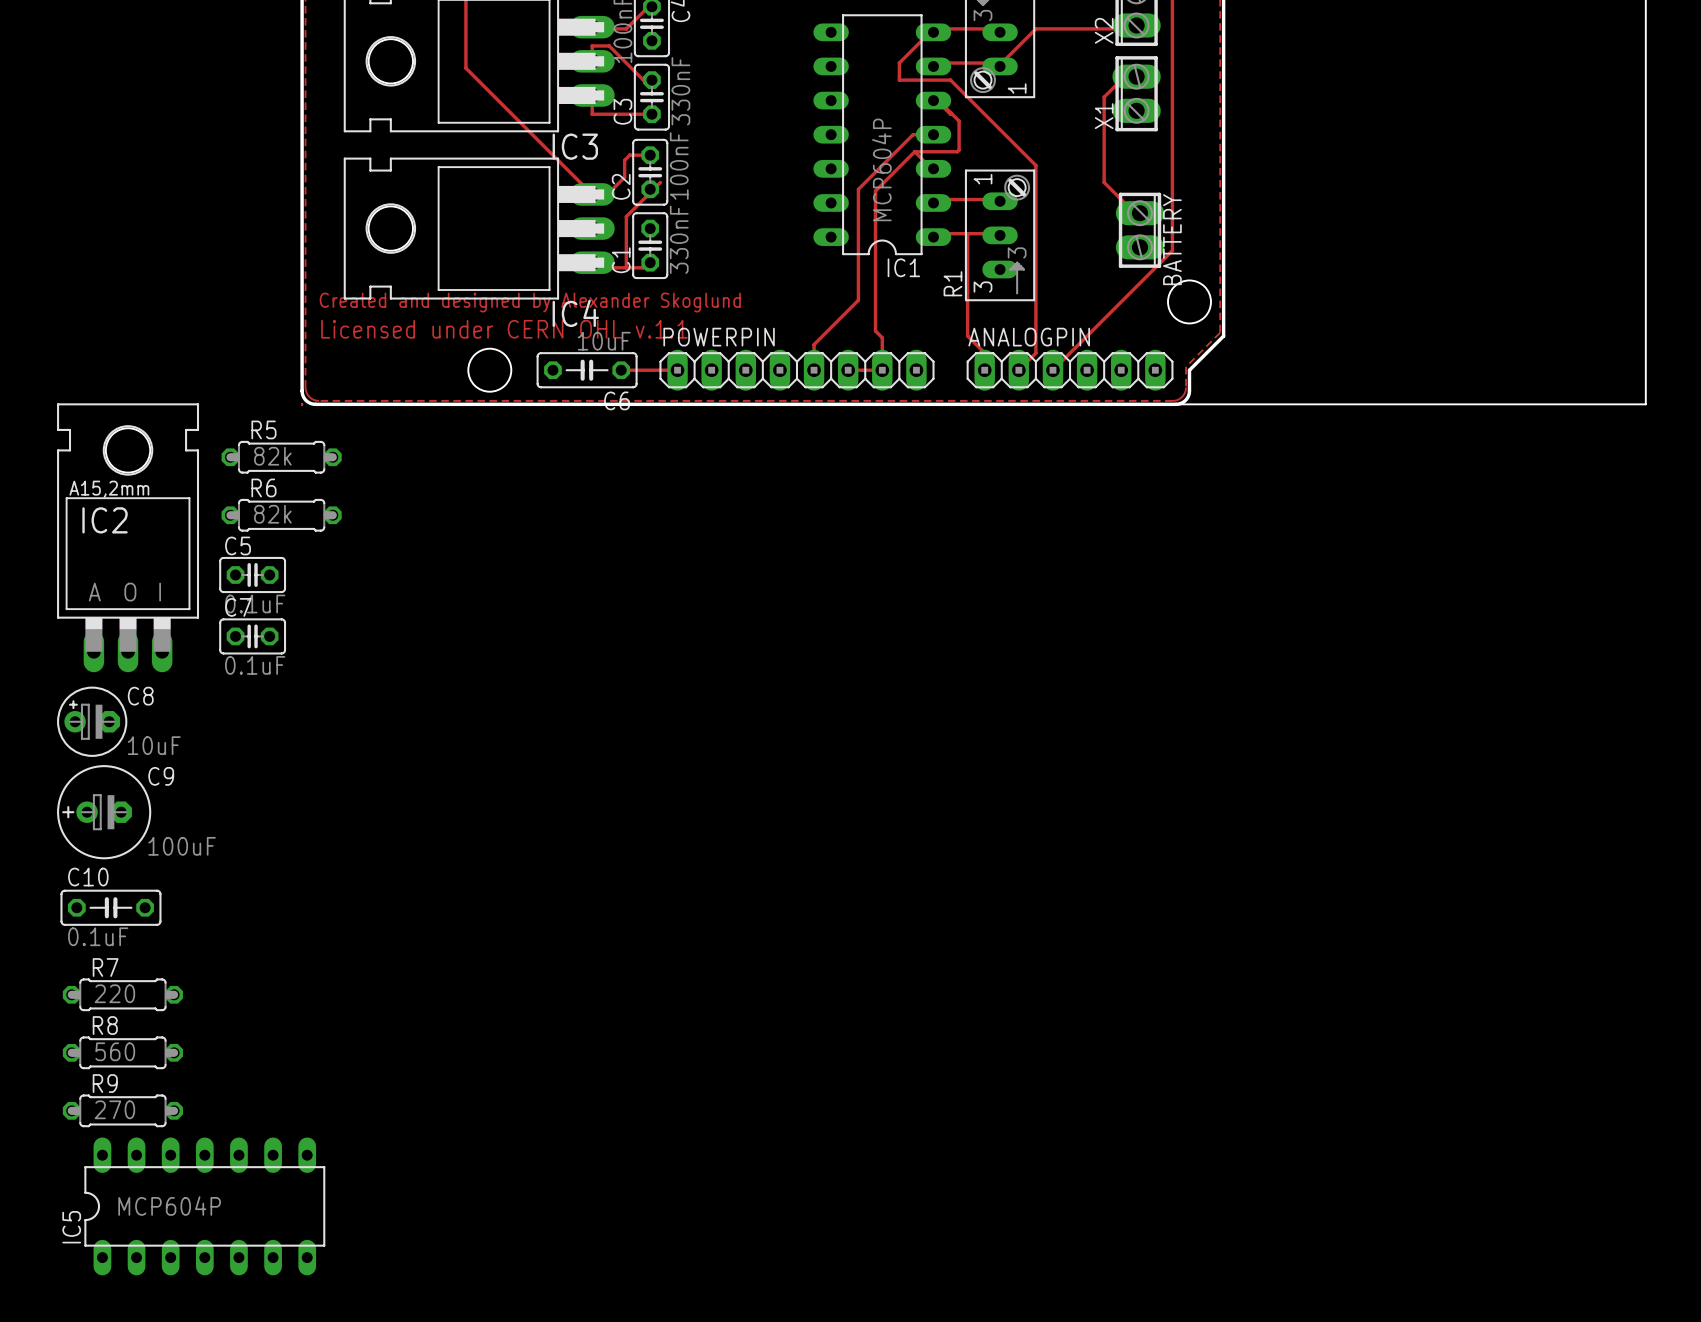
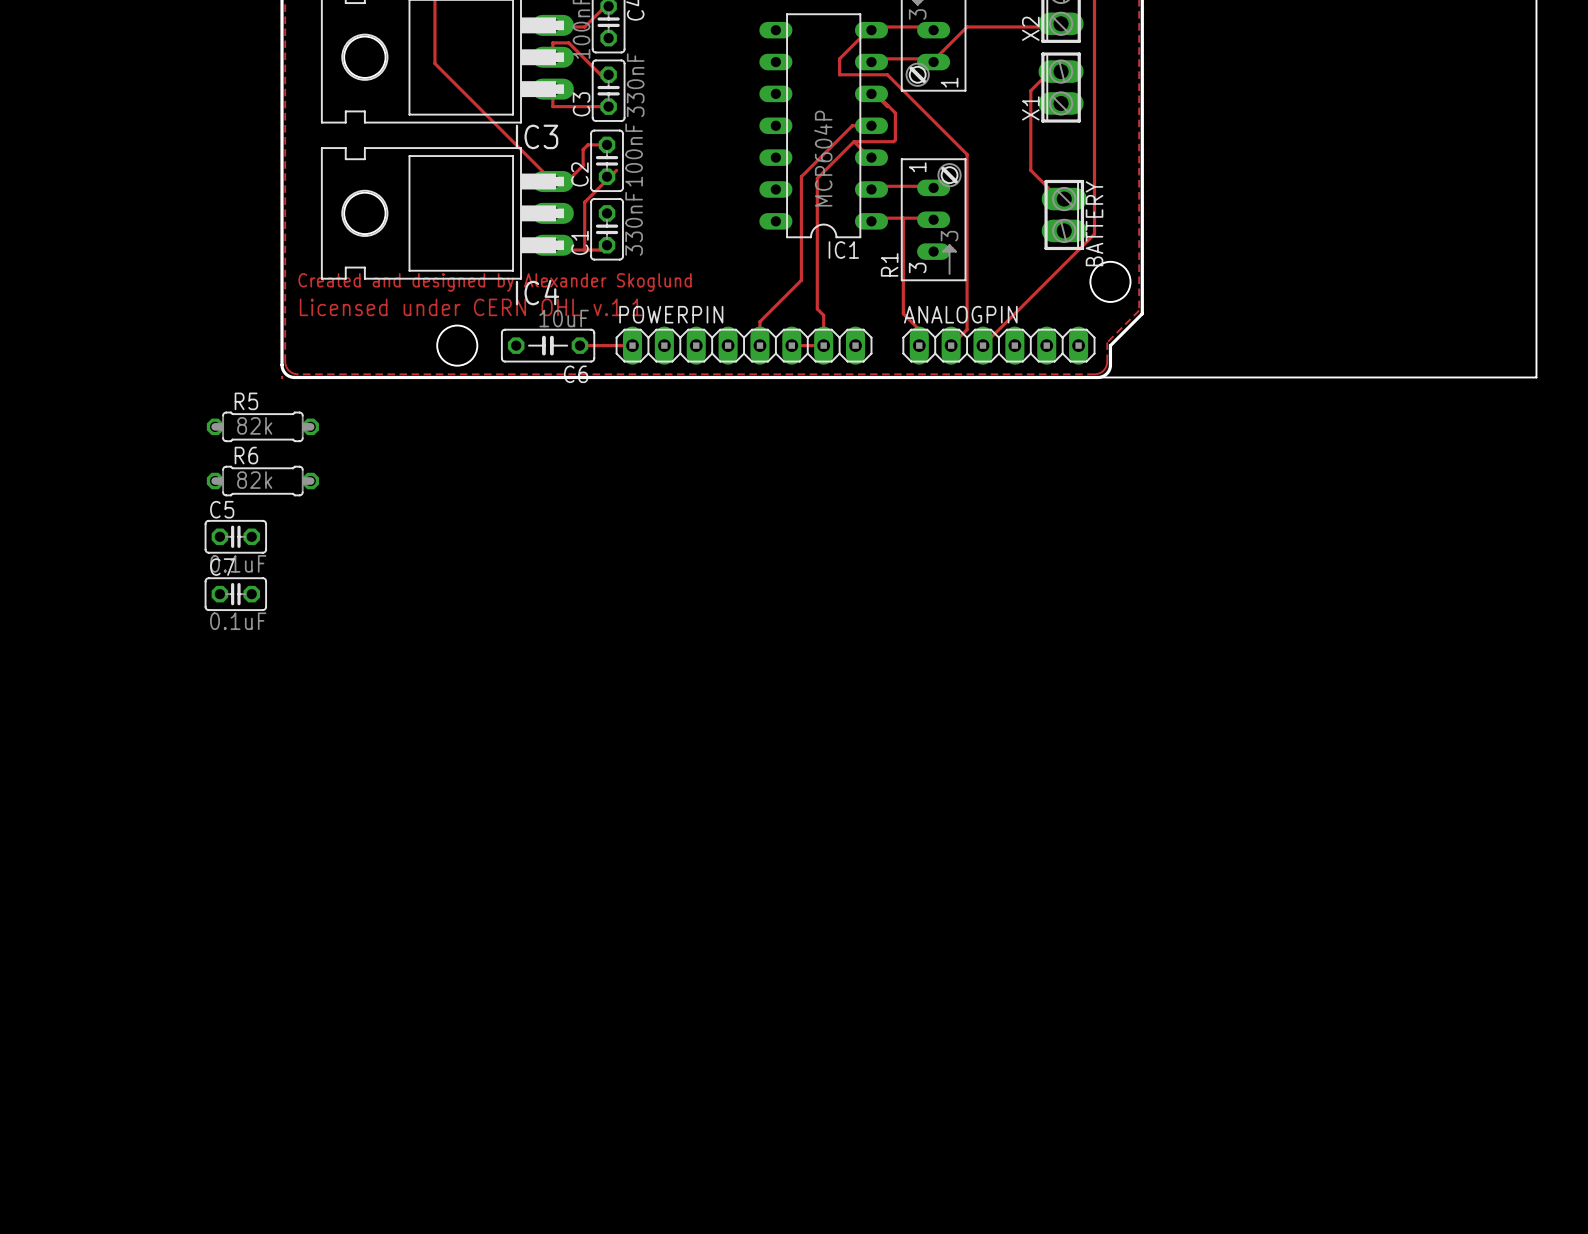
IC2: (128, 537) -> none
C8: 10uF (92, 721) -> none
C9: 100uF (104, 812) -> none
C10: 0.1uF (110, 907) -> none
R7: 220 (122, 994) -> none
R8: 560 (122, 1052) -> none
R9: 270 (122, 1110) -> none
IC5: MCP604P (204, 1206) -> none

